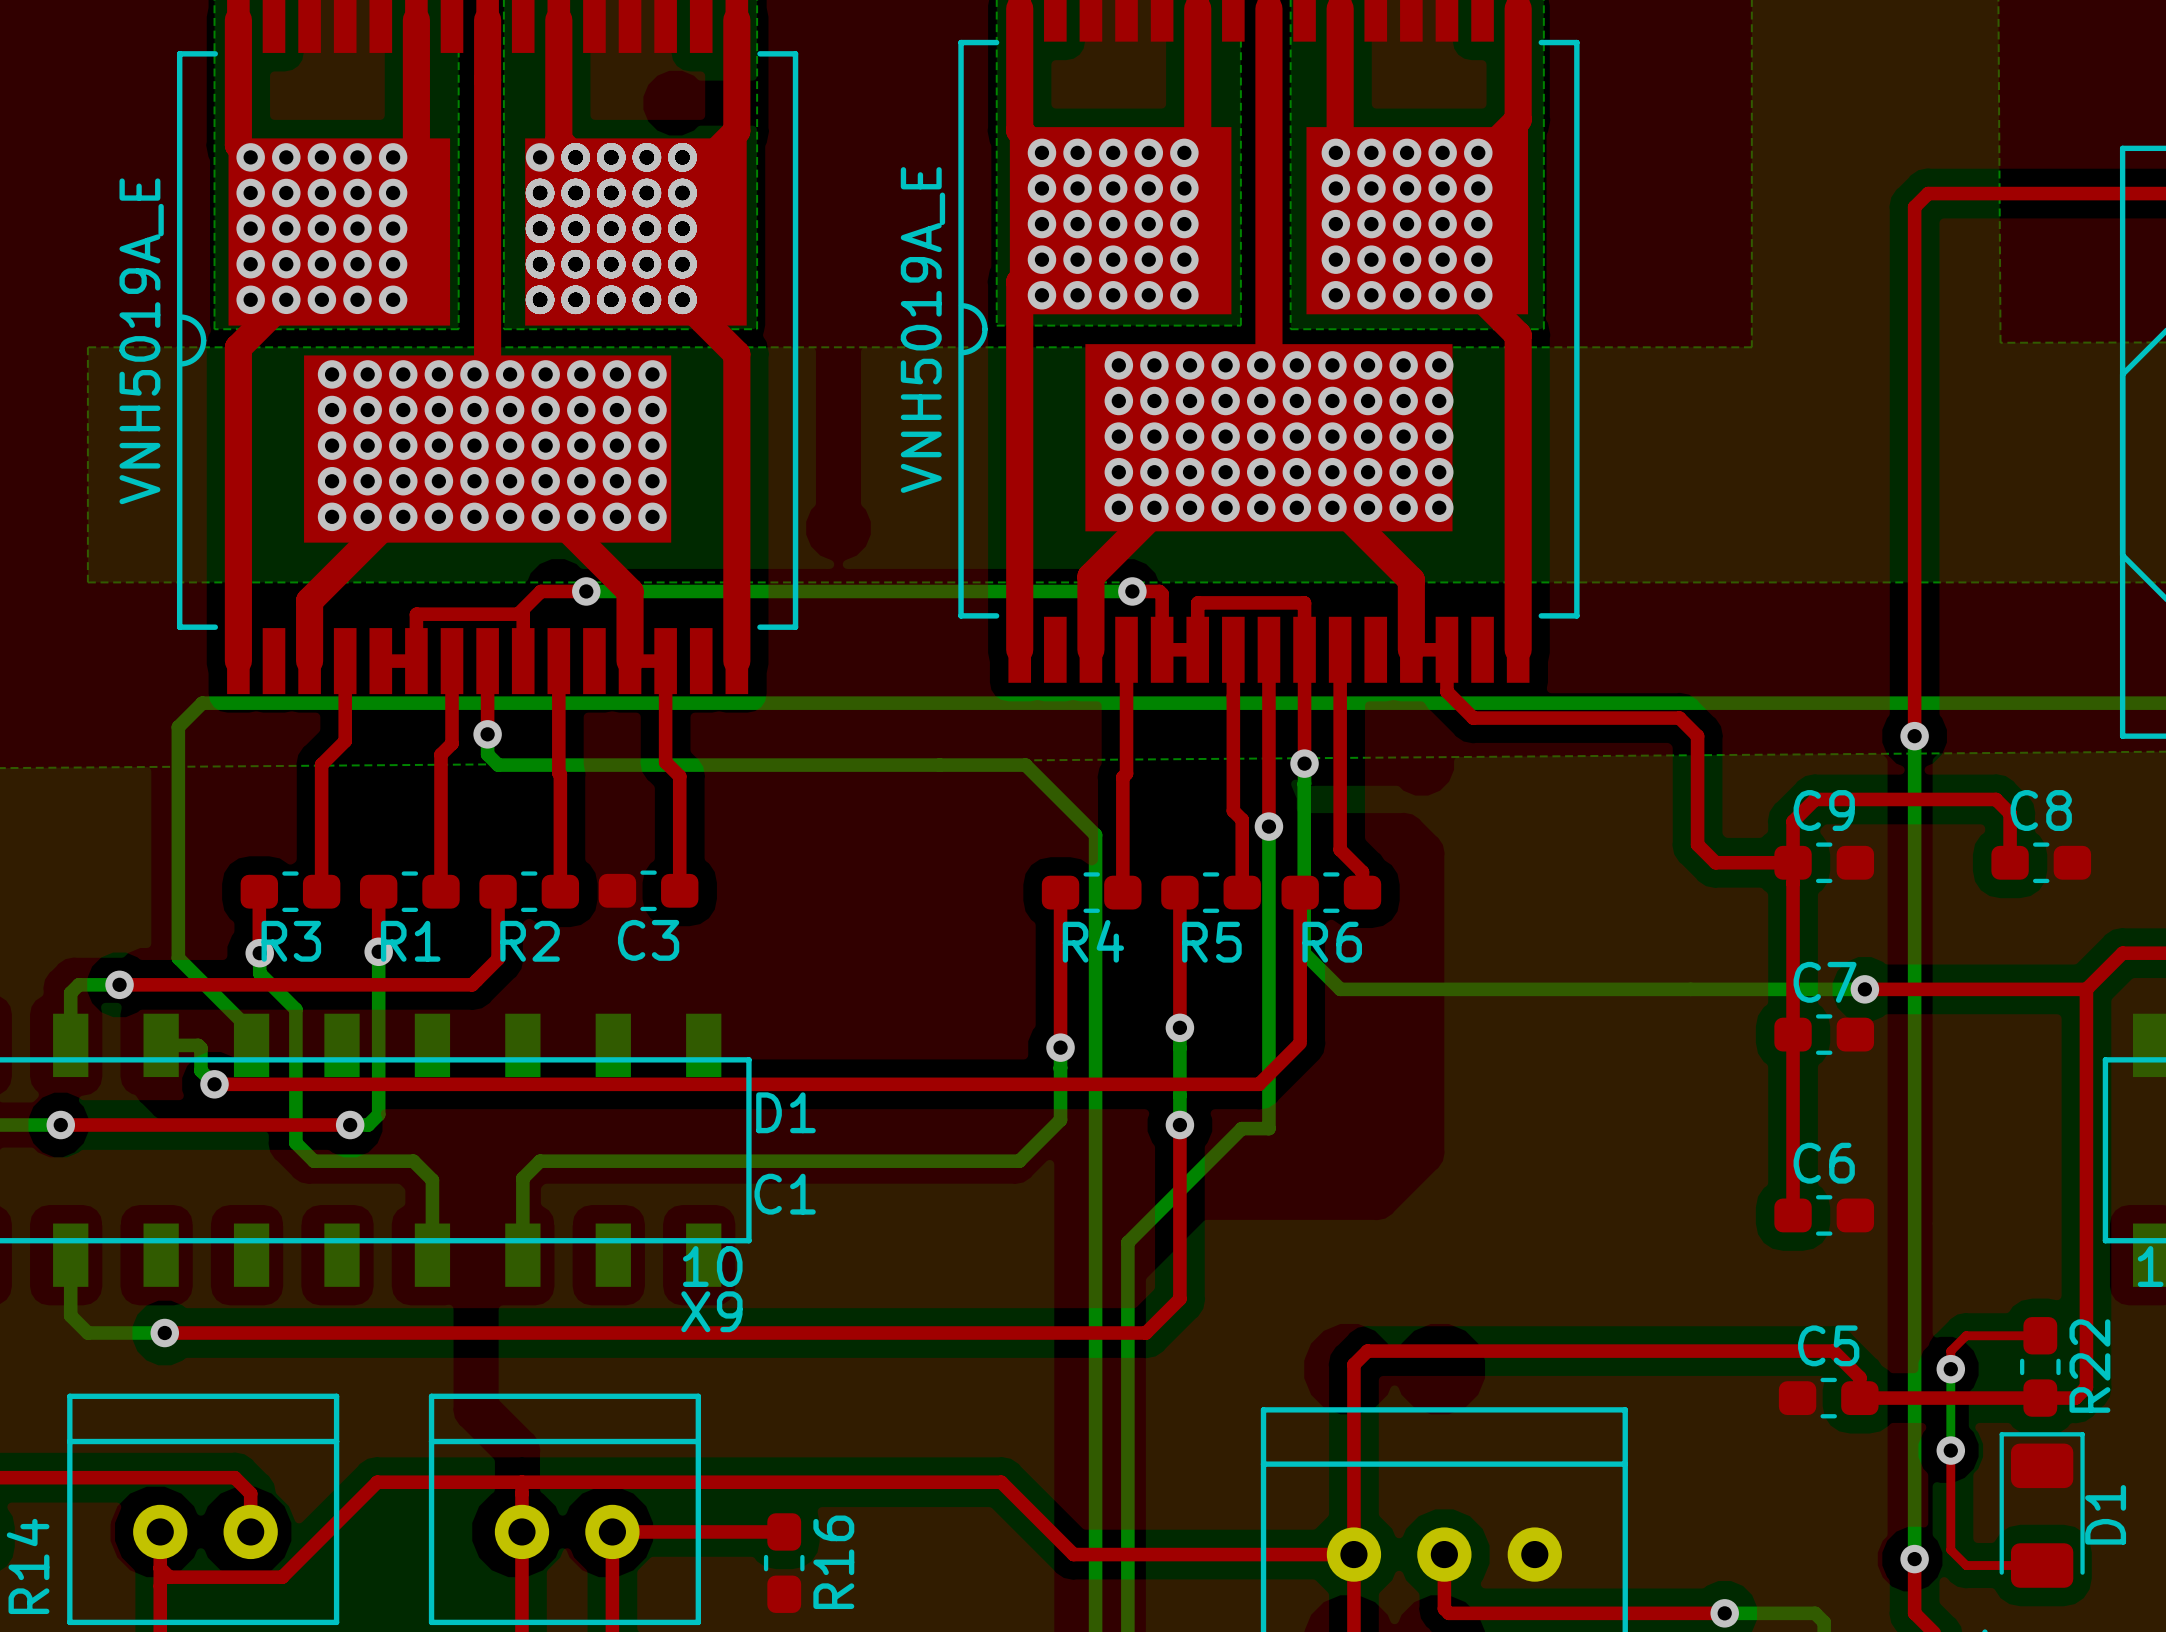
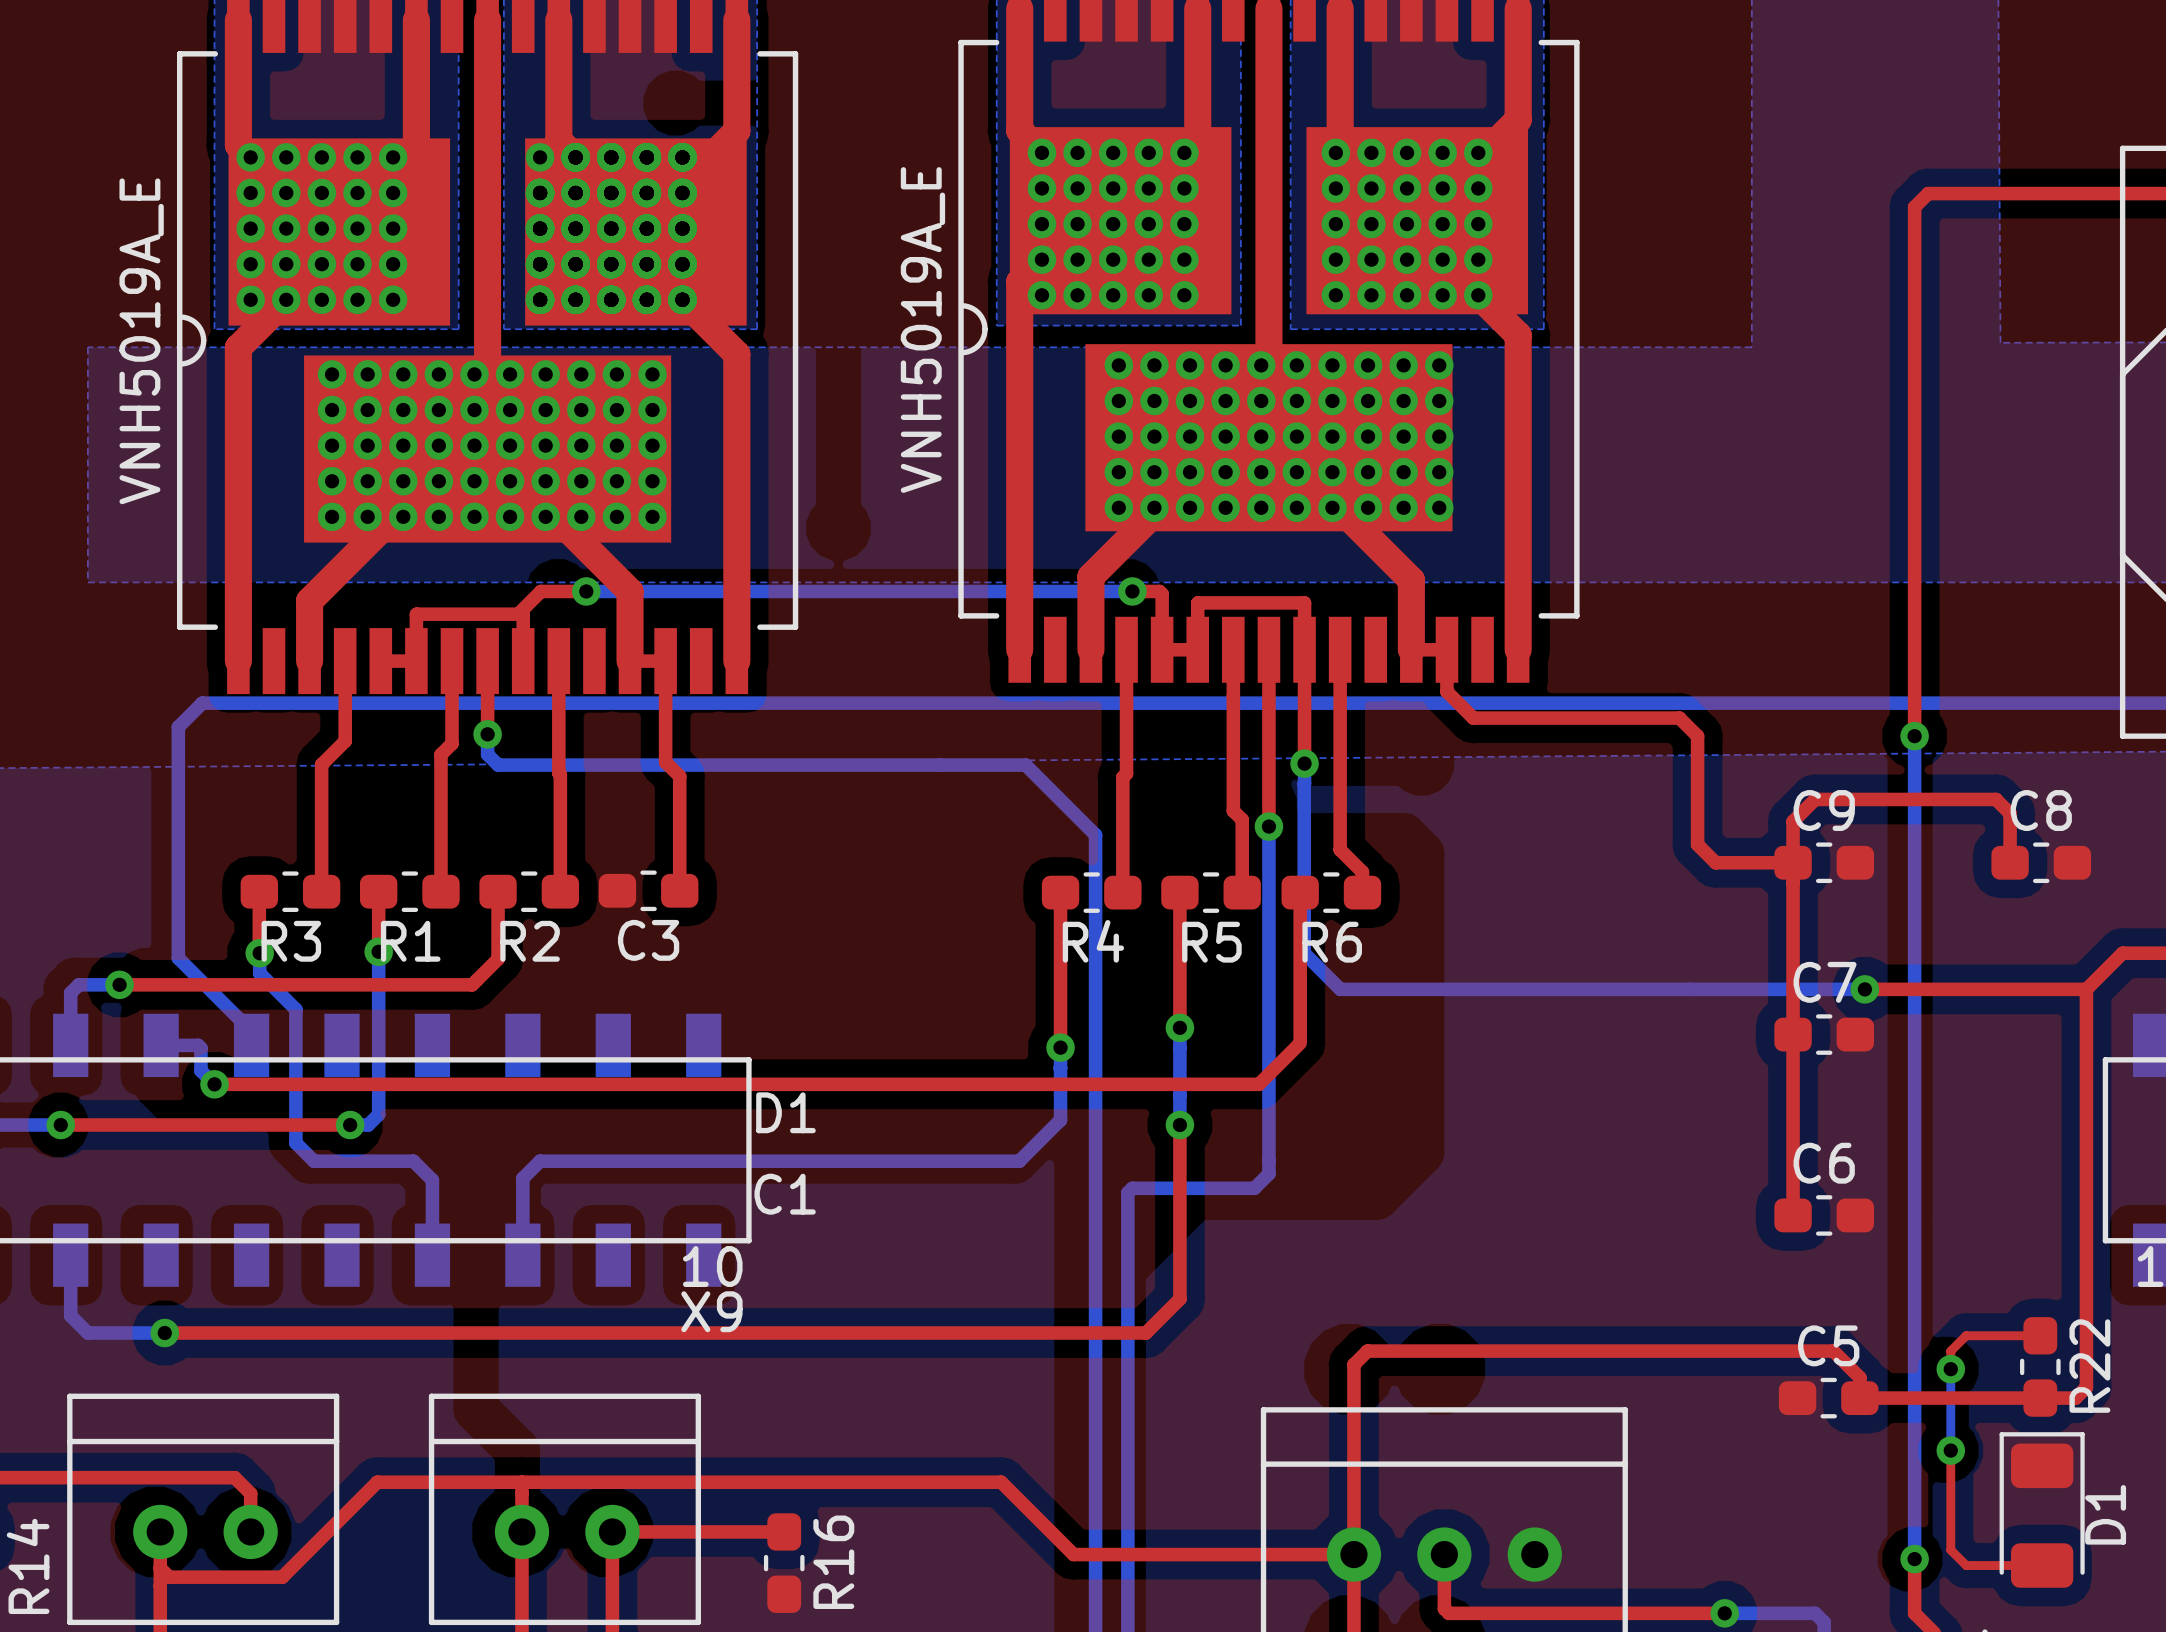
bottom track: (1268, 1128) (1241, 1128) (1127, 1242) -> (1268, 1128) (1268, 1173) (1254, 1188) (1132, 1188) (1127, 1192) (1127, 1242)

